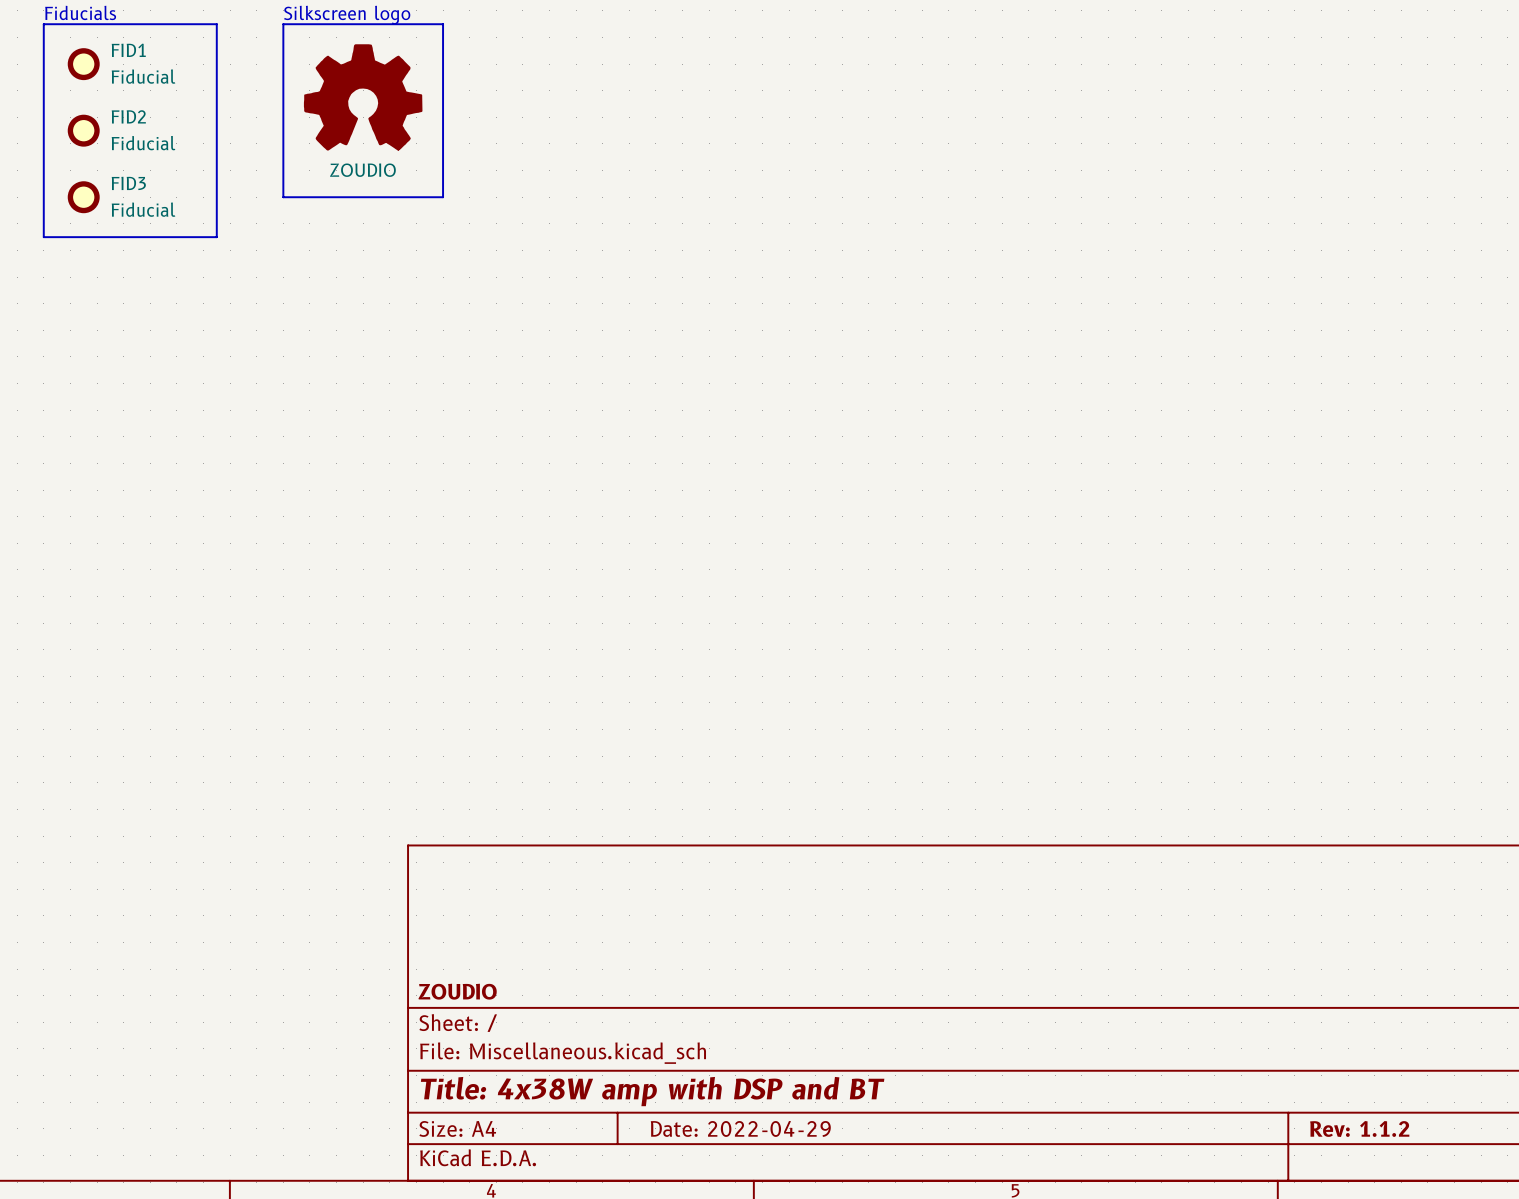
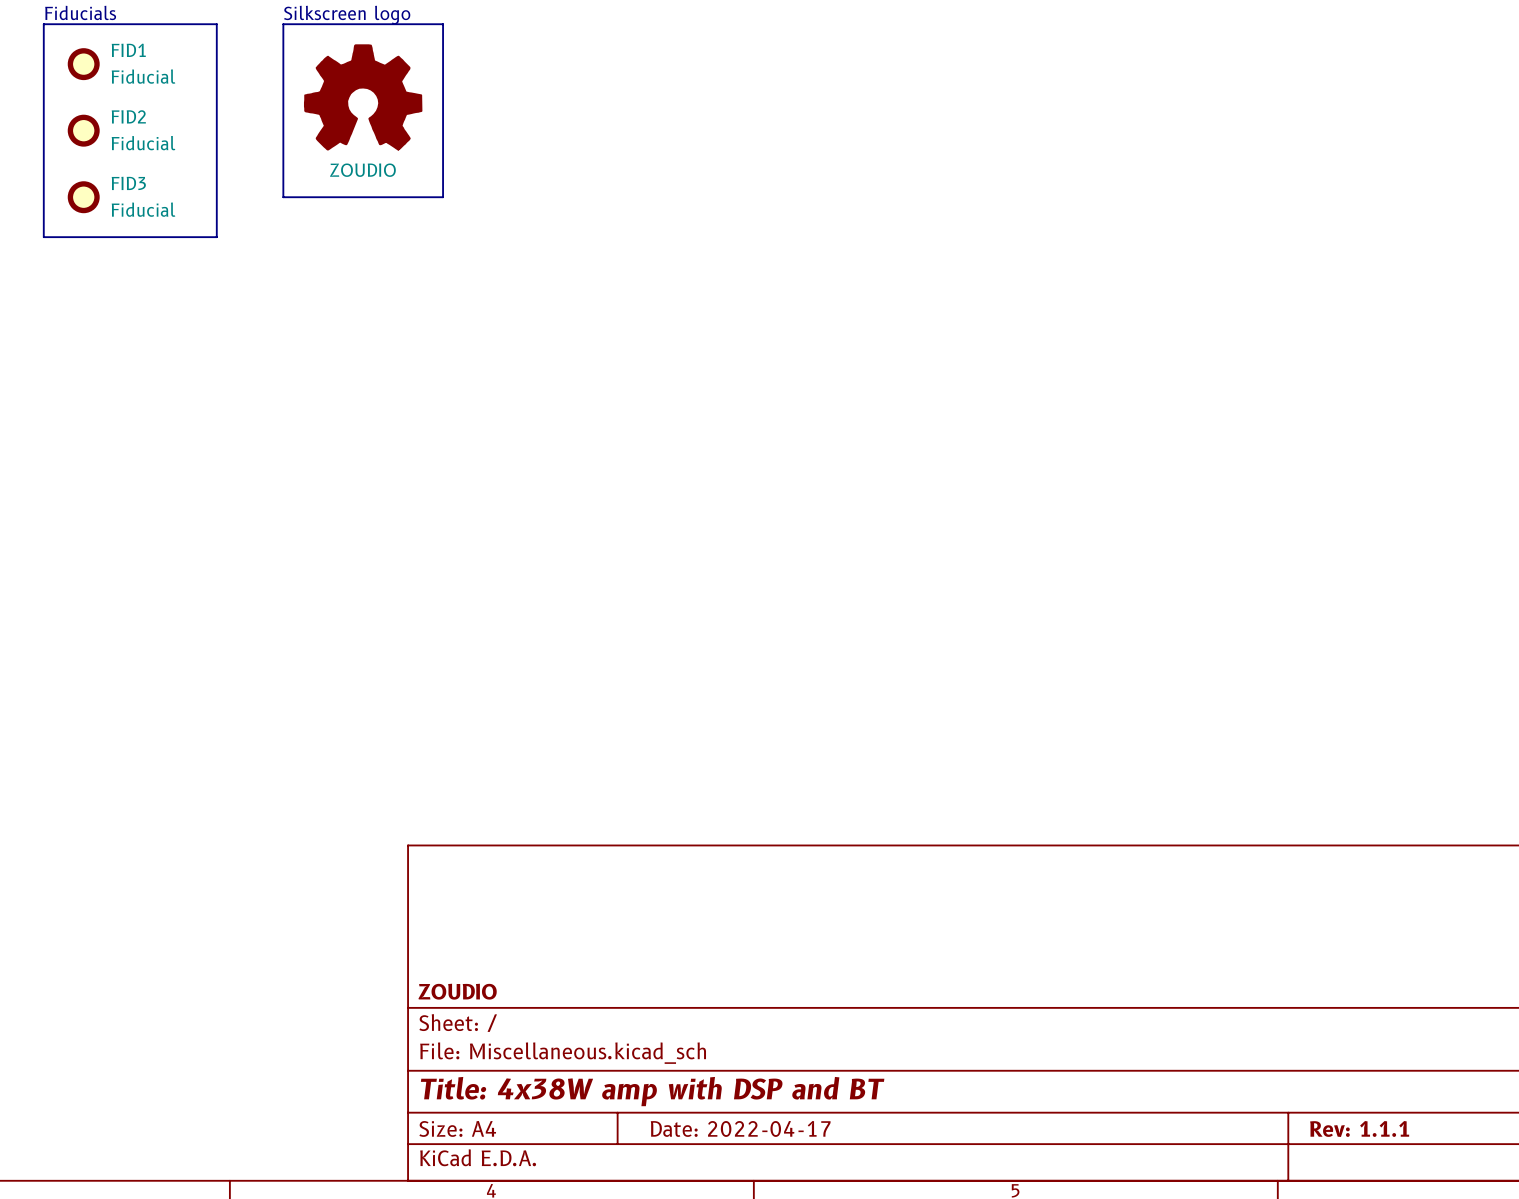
title block: Date: 2022-04-29 (740, 1128) -> Date: 2022-04-17 (740, 1128)
title block: Rev: 1.1.2 (1359, 1128) -> Rev: 1.1.1 (1359, 1128)

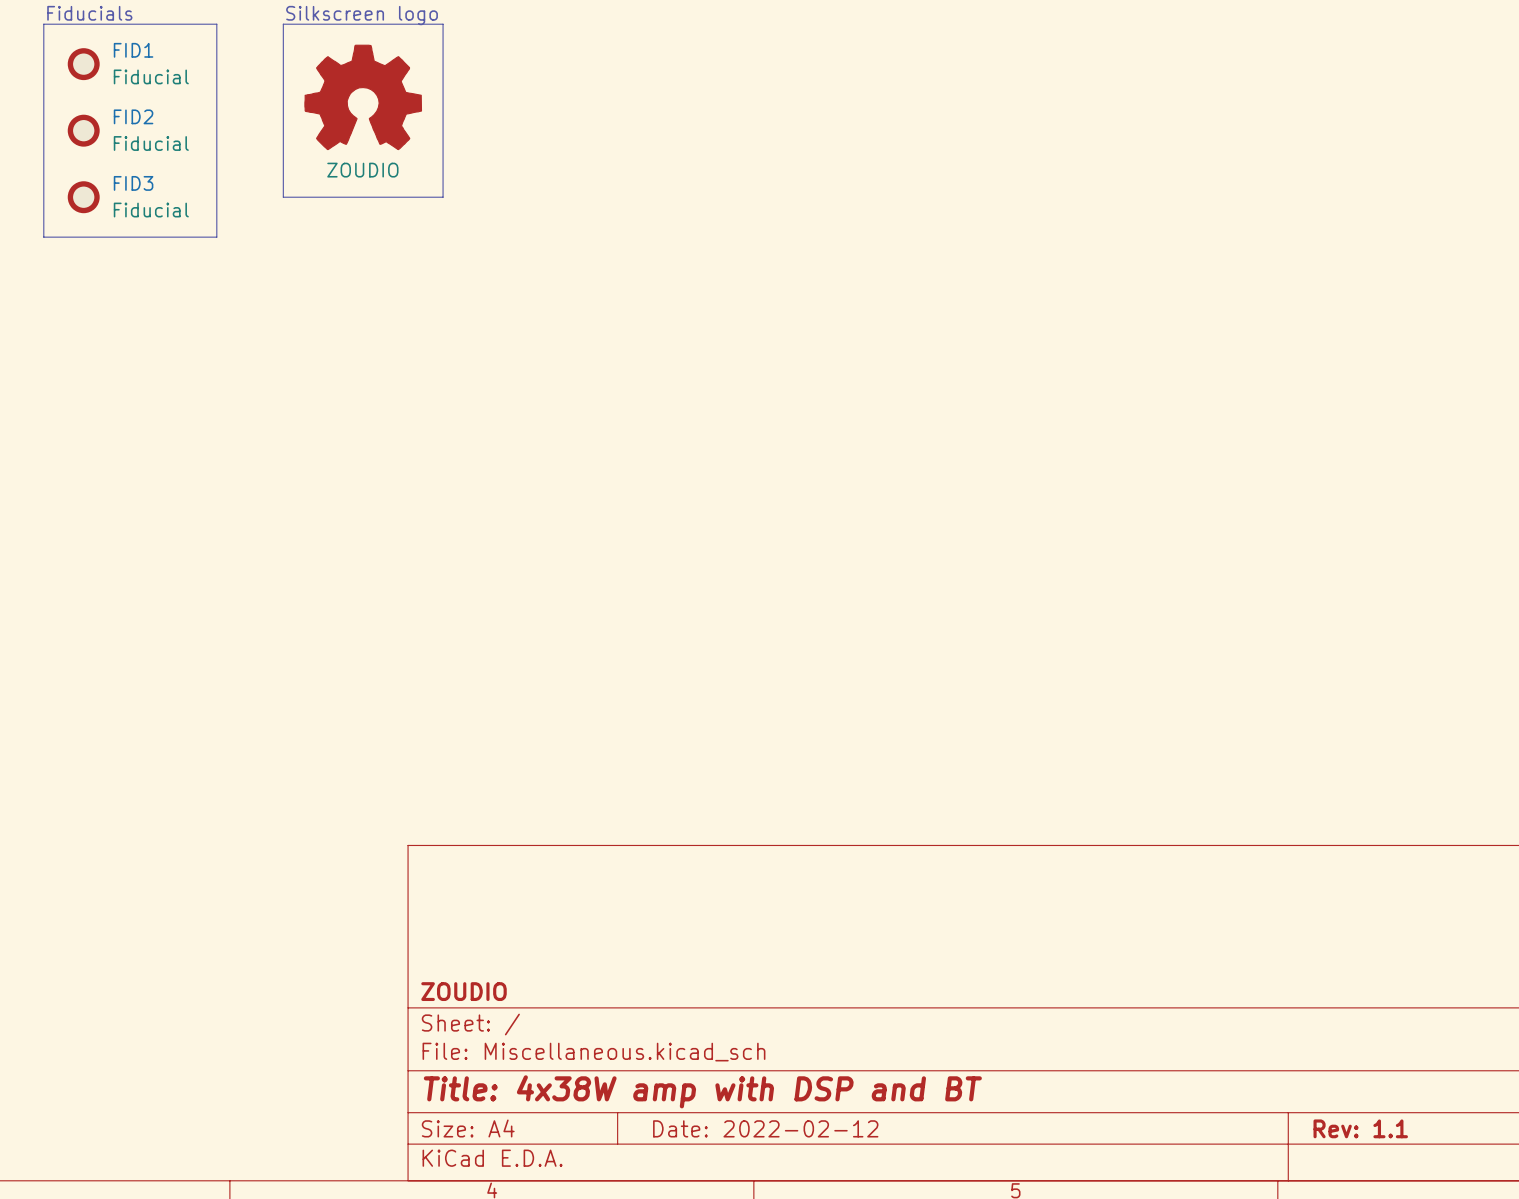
title block: Date: 2022-04-17 (740, 1128) -> Date: 2022-02-12 (765, 1128)
title block: Rev: 1.1.1 (1359, 1128) -> Rev: 1.1 (1360, 1128)

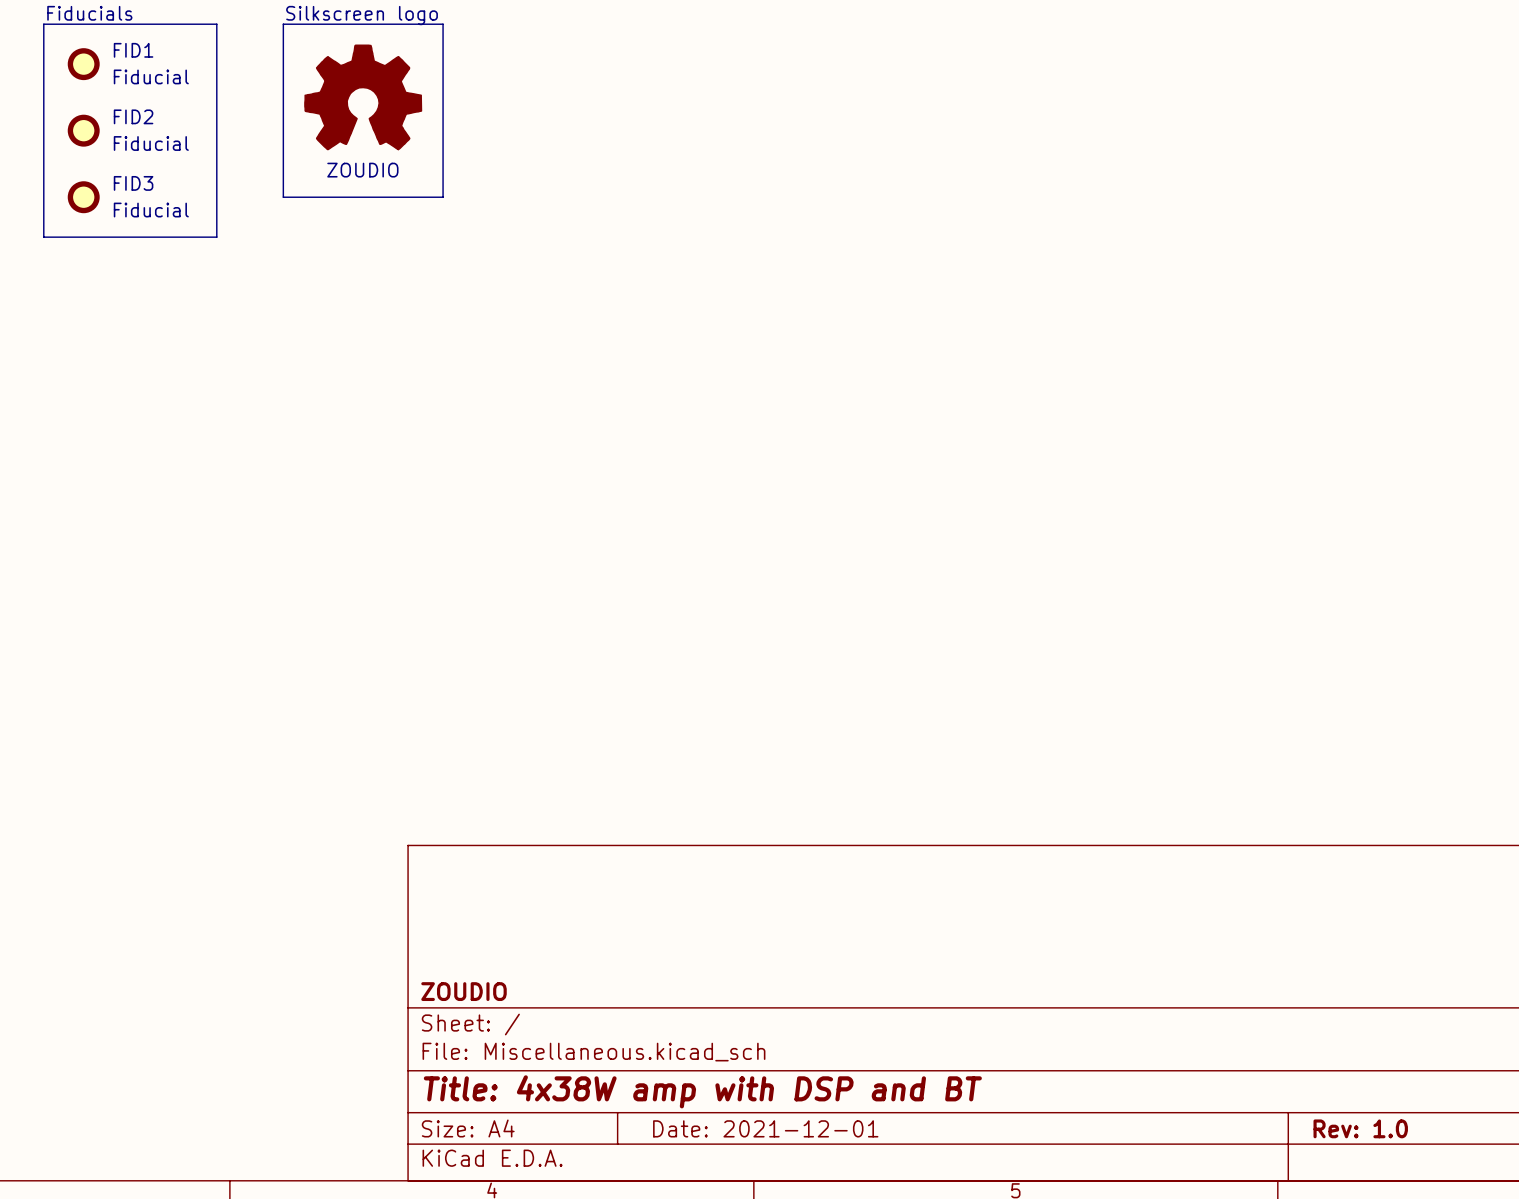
title block: Date: 2022-02-12 (765, 1128) -> Date: 2021-12-01 (765, 1128)
title block: Rev: 1.1 (1360, 1128) -> Rev: 1.0 (1360, 1128)

